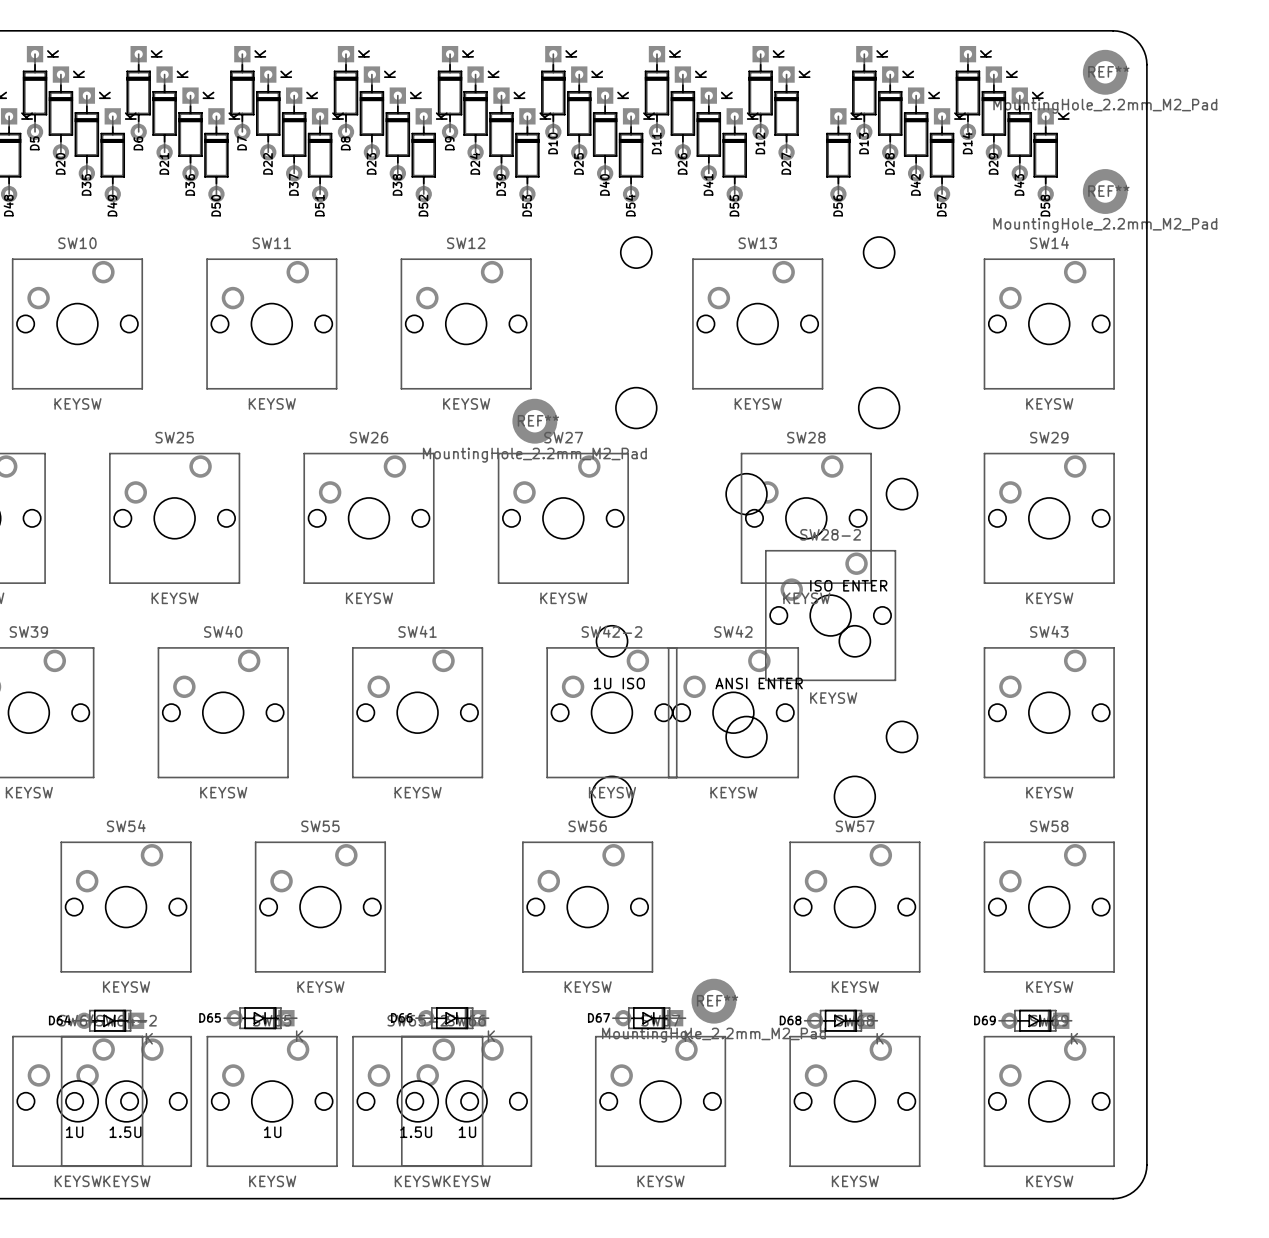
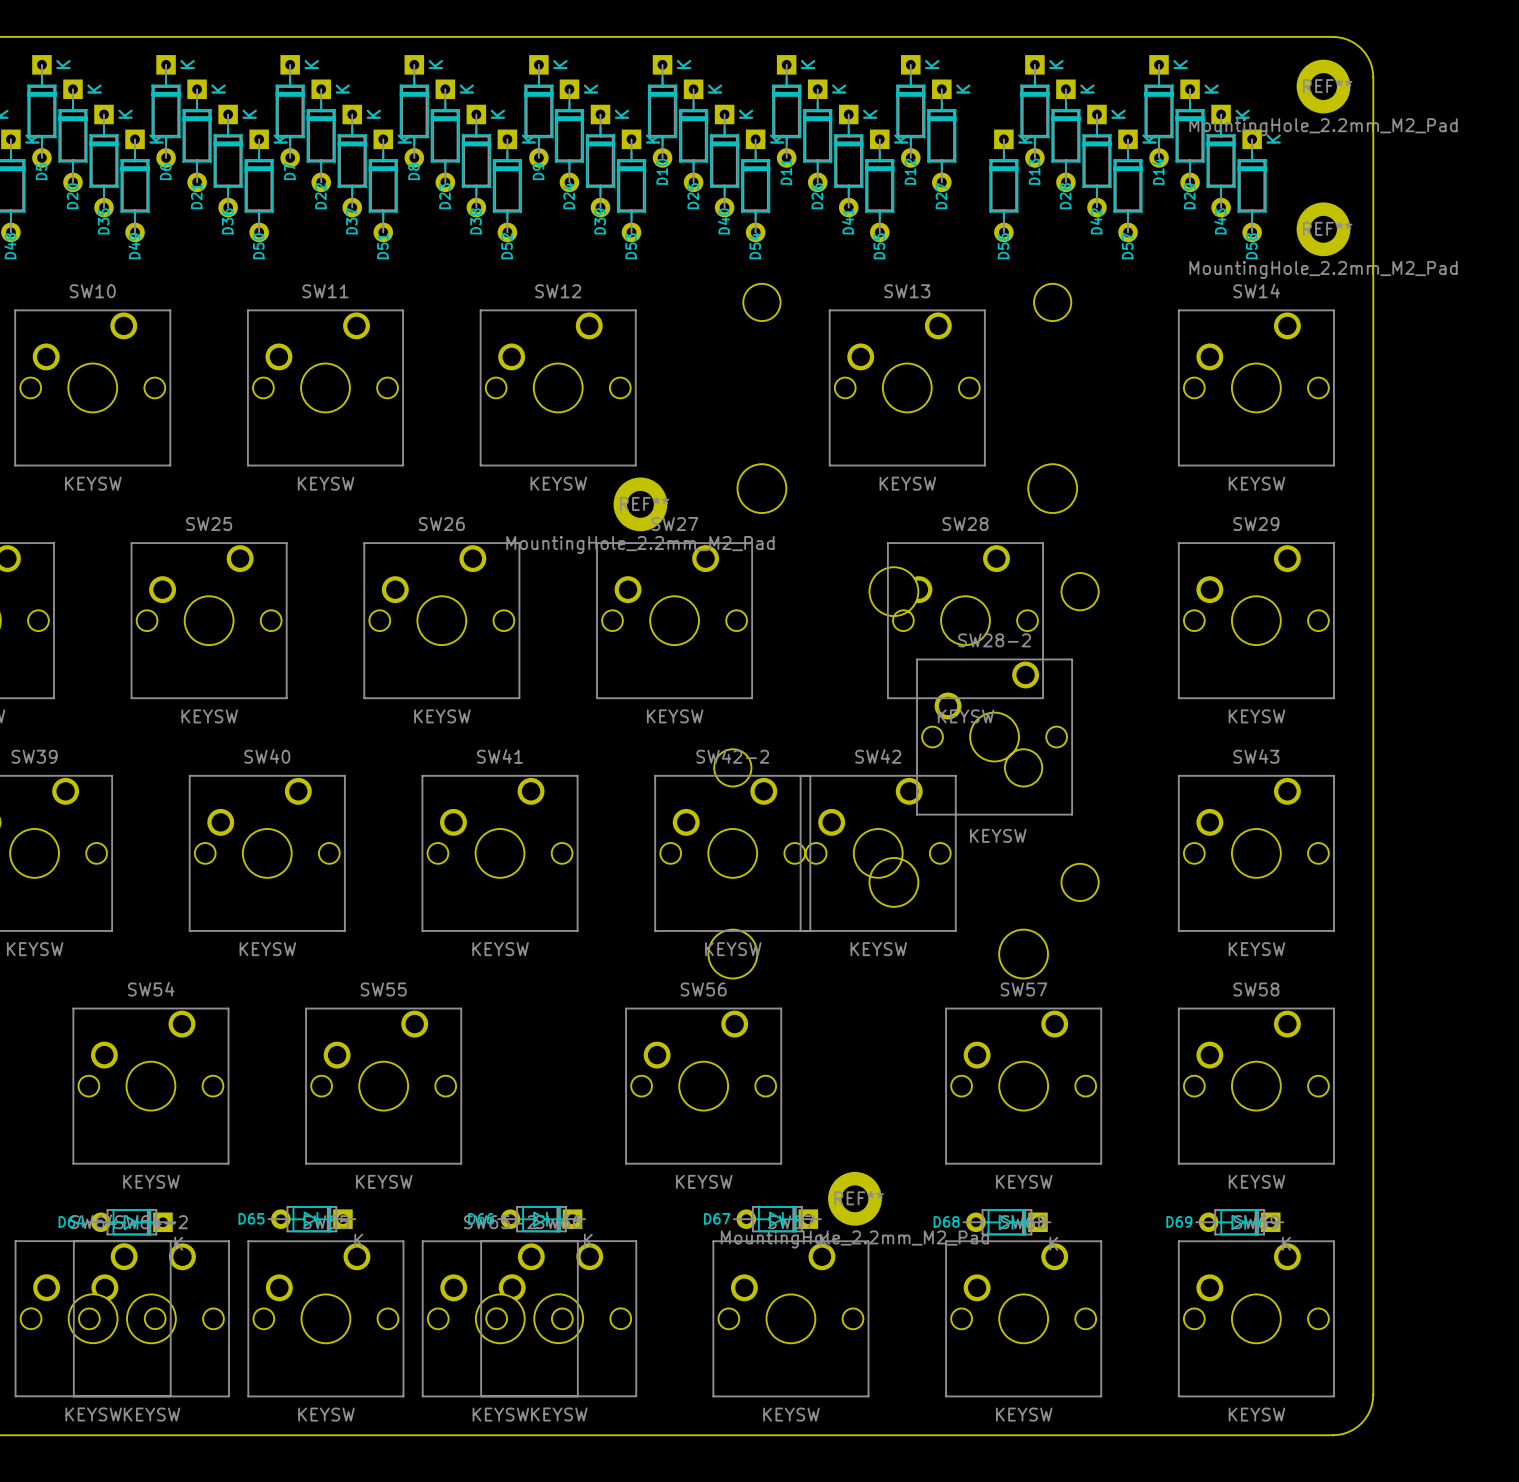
text: ISO ENTER (848, 585) -> none
text: 1U ISO (619, 683) -> none
text: ANSI ENTER (759, 683) -> none
text: 1U (74, 1132) -> none
text: 1.5U (125, 1132) -> none
text: 1U (272, 1132) -> none
text: 1.5U (416, 1132) -> none
text: 1U (467, 1132) -> none

